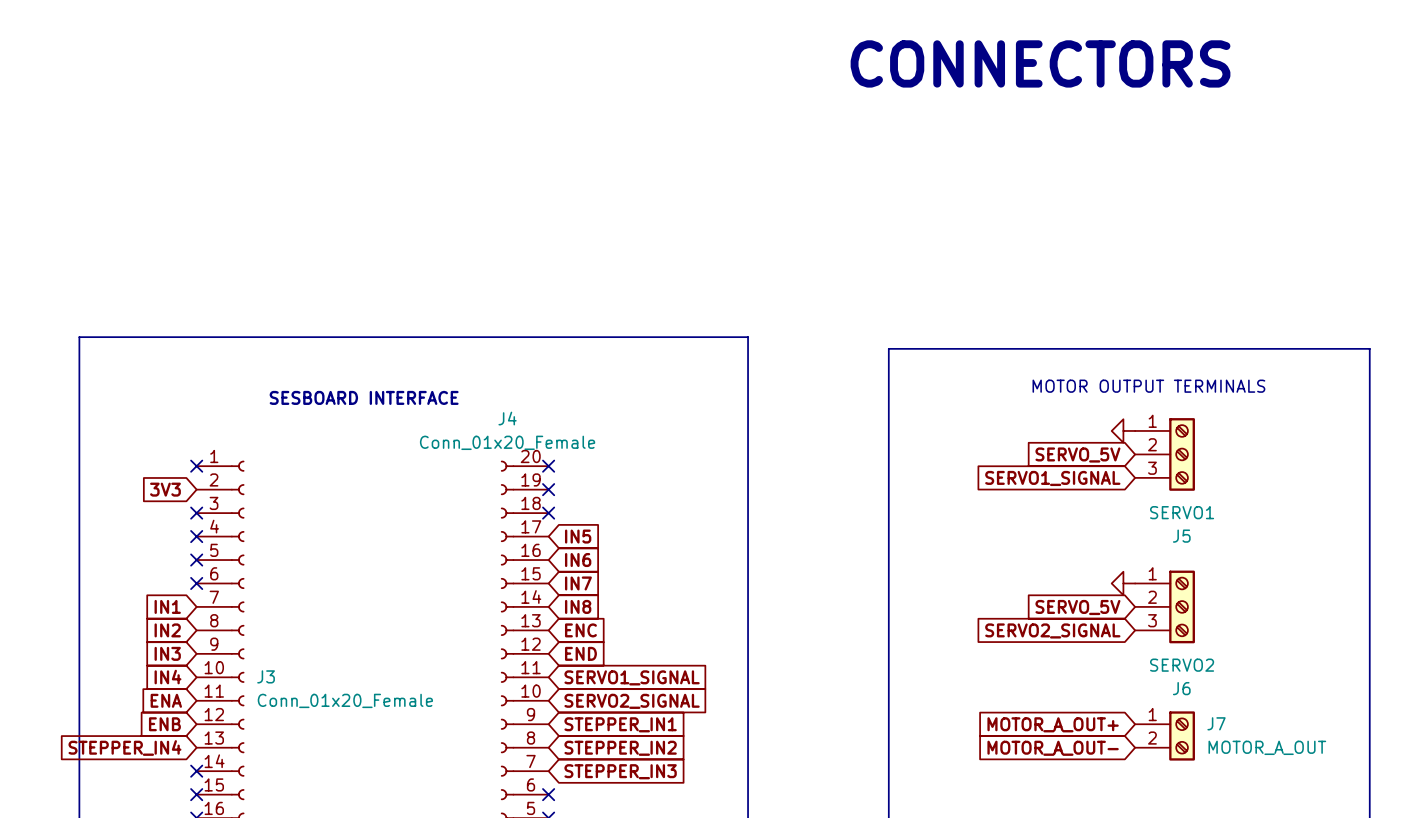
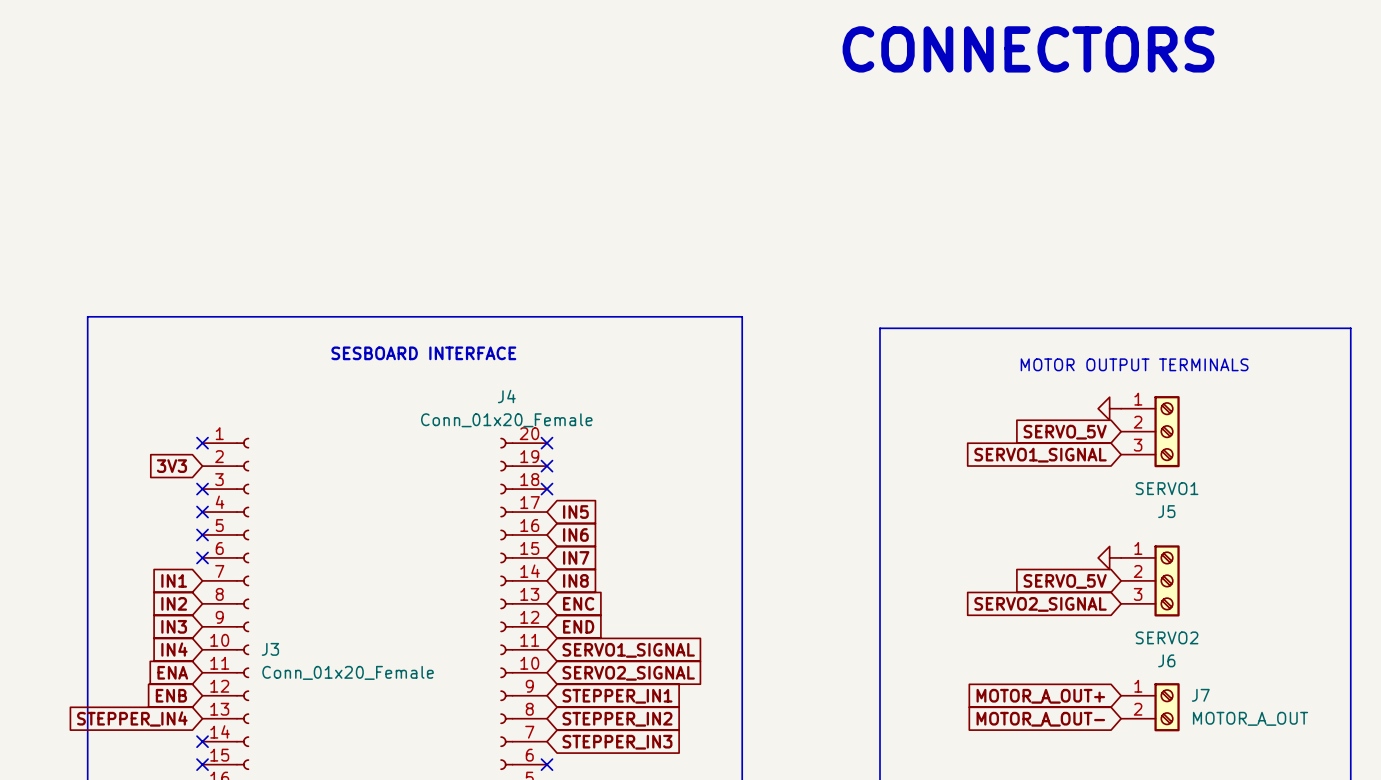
text position: SESBOARD INTERFACE (364, 397) -> SESBOARD INTERFACE (423, 353)

